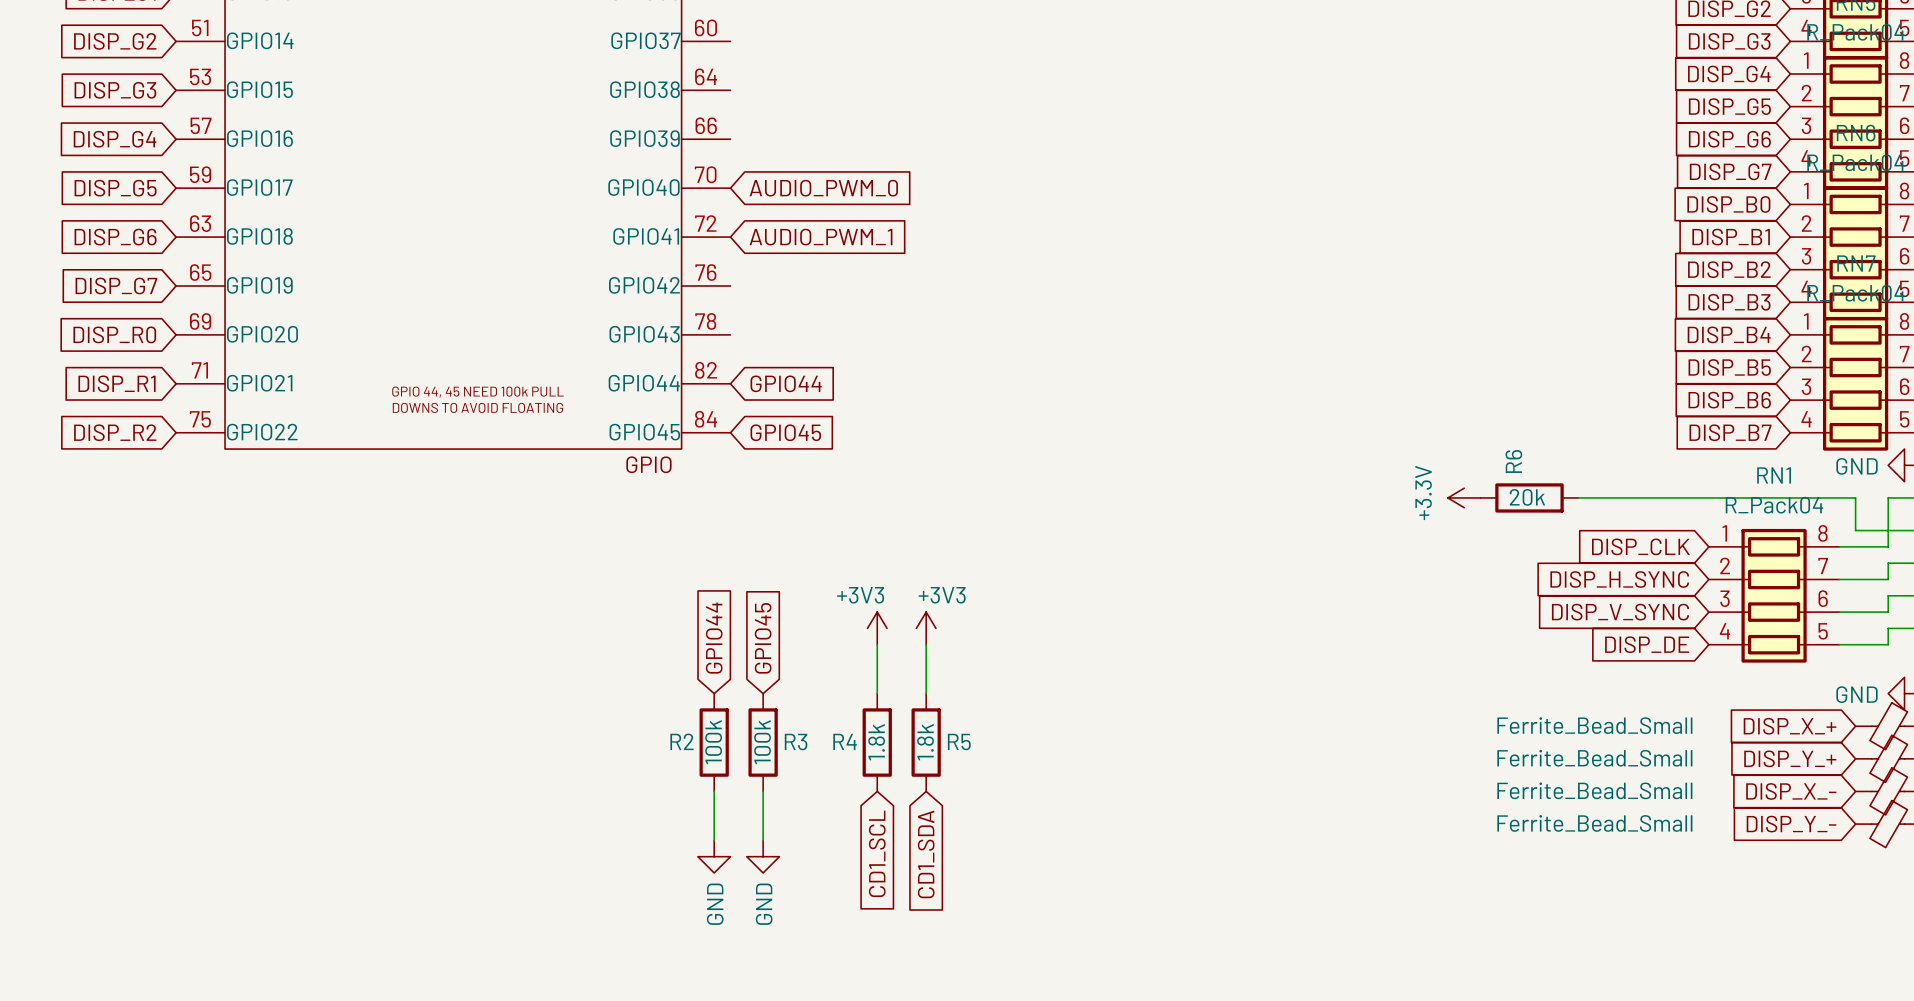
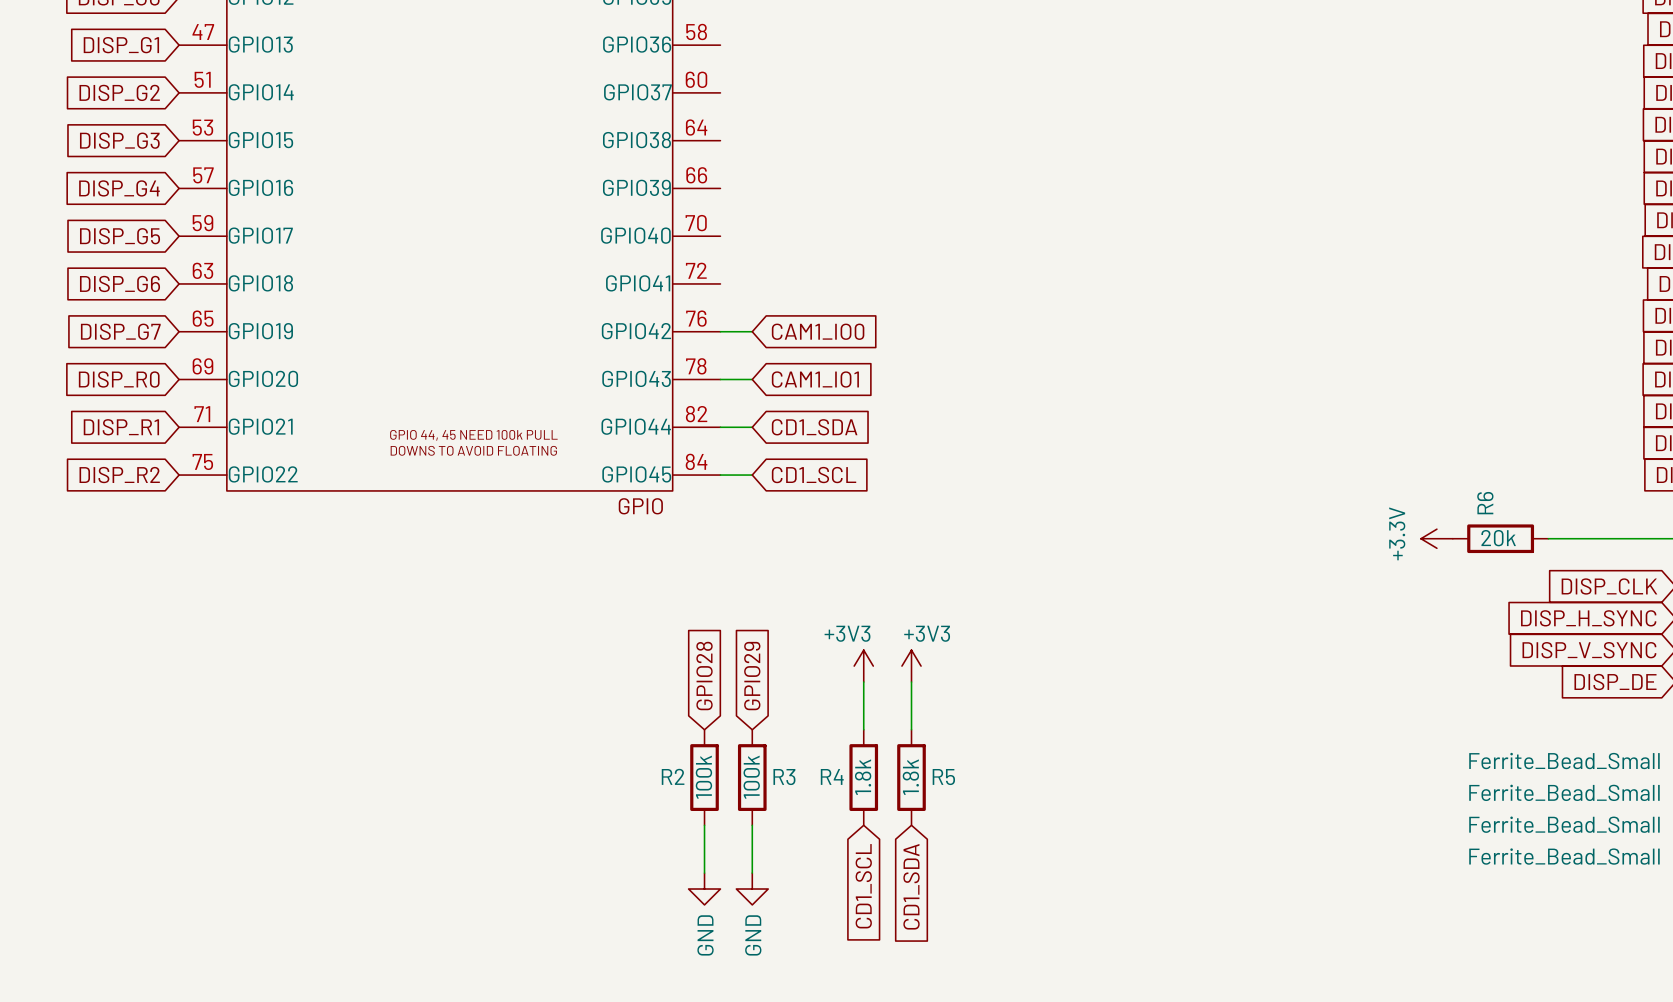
global label: AUDIO_PWM_0 (823, 188) -> none
global label: AUDIO_PWM_1 (821, 237) -> none
wire: none -> (720, 331) (752, 331)
global label: none -> CAM1_IO0 (818, 331)
wire: none -> (720, 379) (752, 379)
global label: none -> CAM1_IO1 (815, 379)
wire: none -> (720, 427) (752, 427)
global label: GPIO44 (786, 383) -> none
global label: none -> CD1_SDA (814, 427)
wire: none -> (720, 475) (752, 475)
global label: GPIO45 (785, 432) -> none
global label: none -> CD1_SCL (814, 475)
global label: GPIO44 (714, 638) -> GPIO28 (704, 676)
global label: GPIO45 (763, 638) -> GPIO29 (752, 676)

